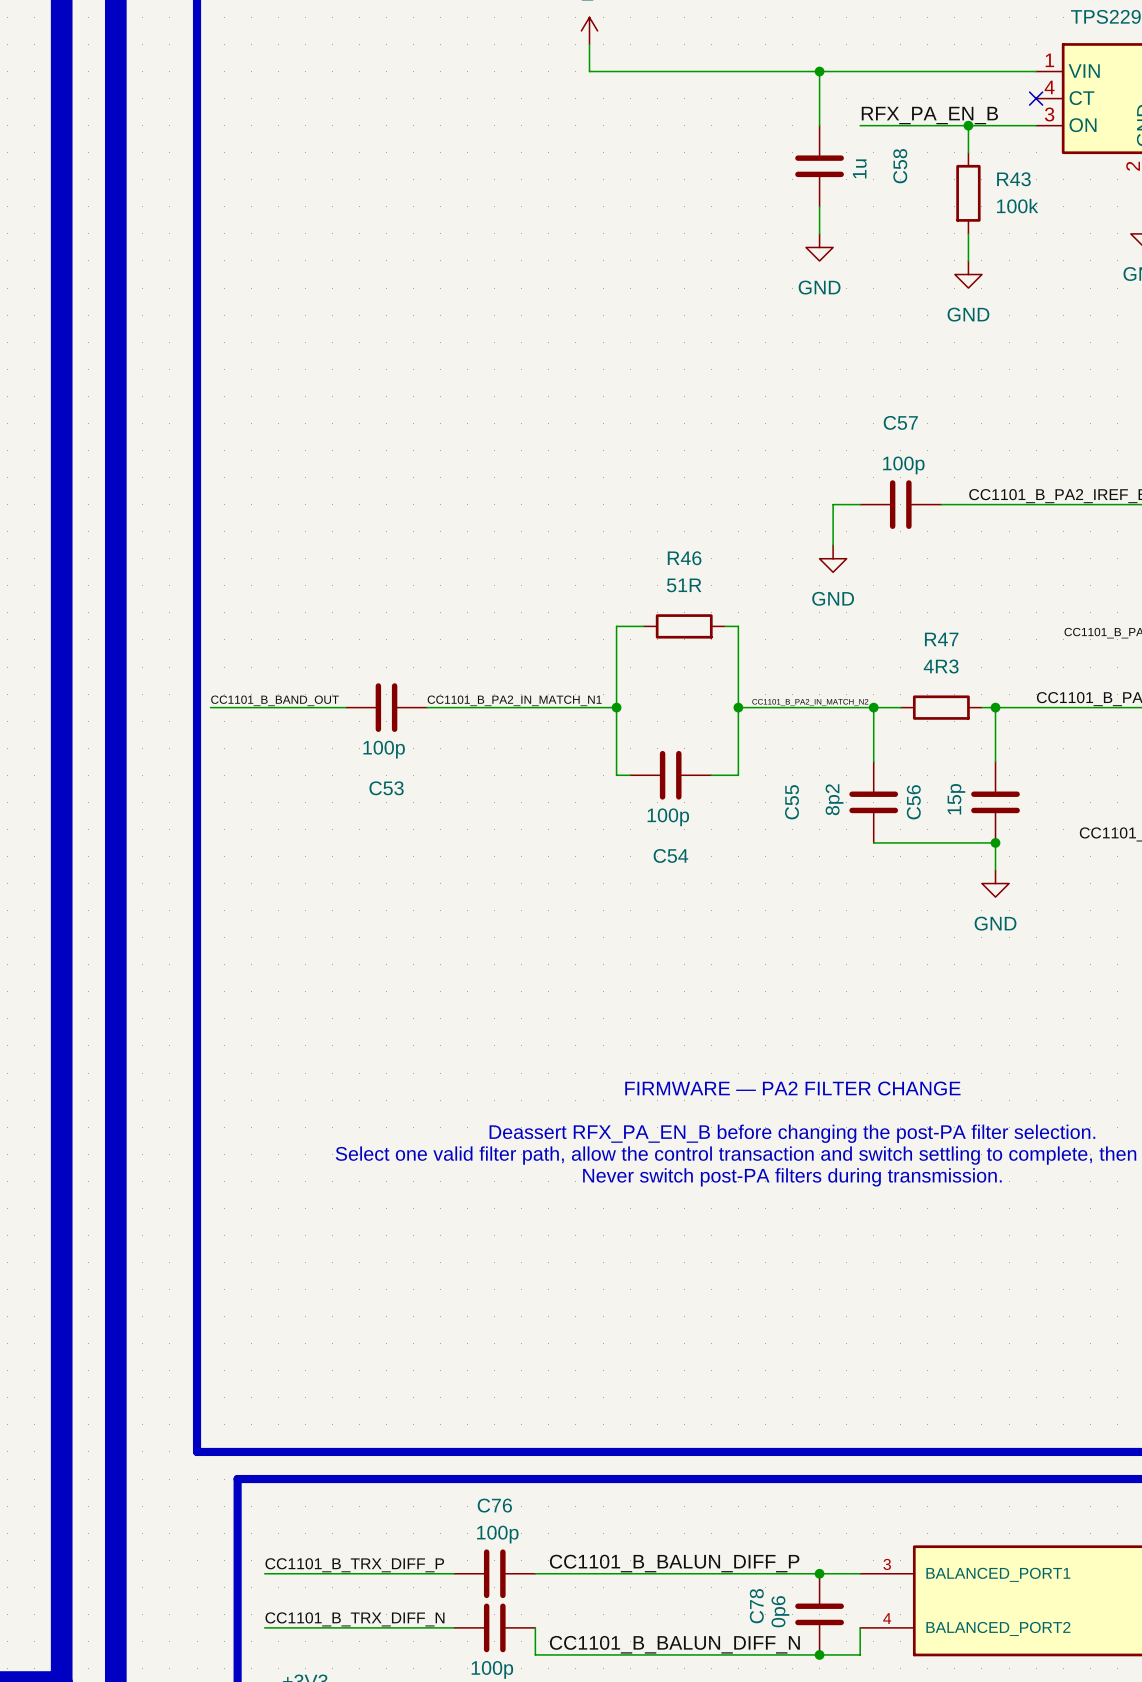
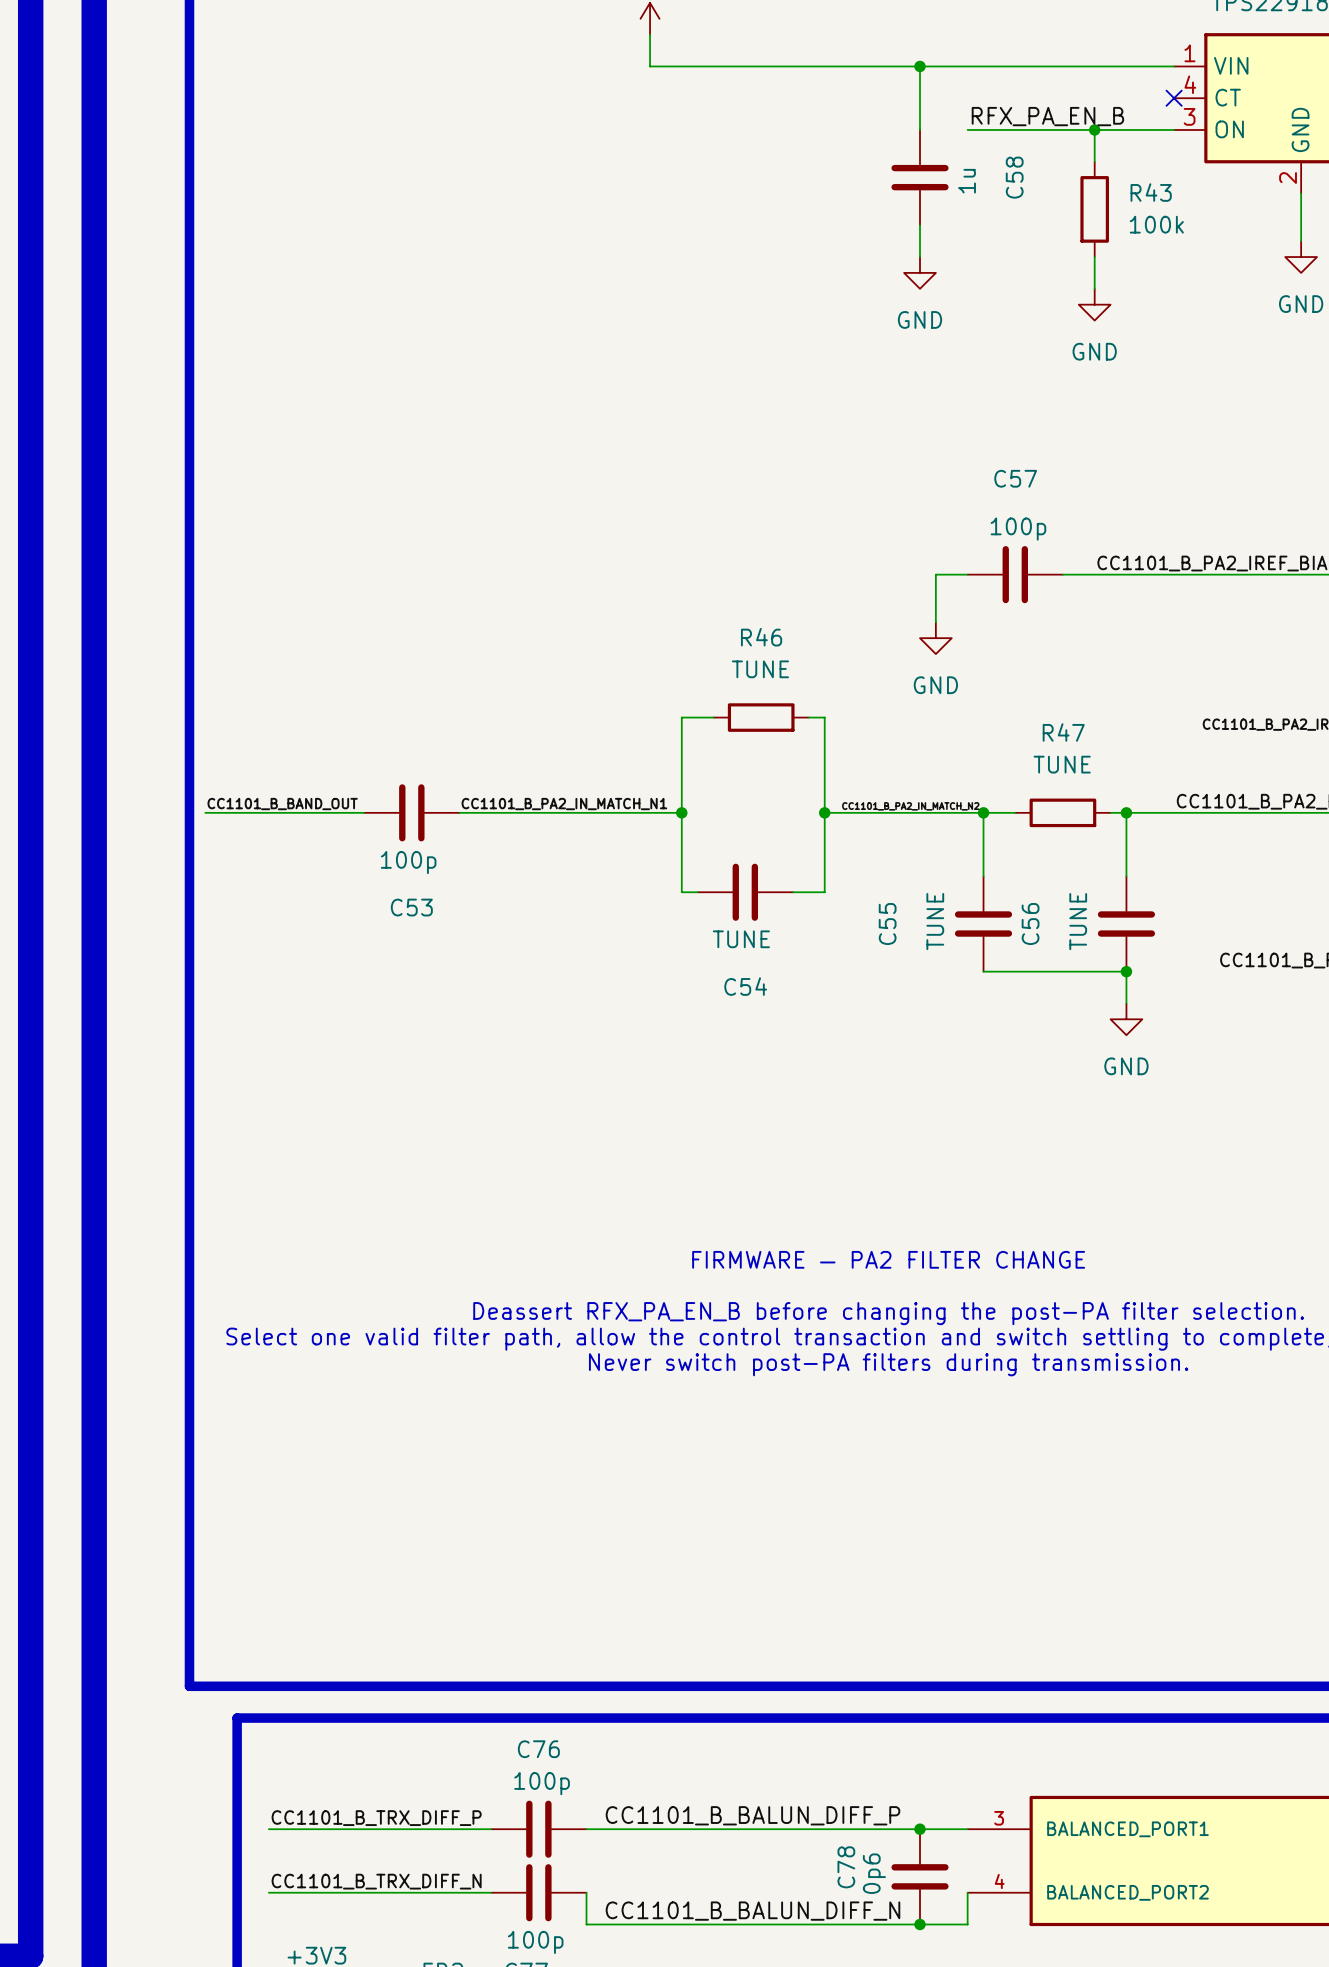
R46 value: 51R (684, 585) -> TUNE (760, 669)
R47 value: 4R3 (941, 666) -> TUNE (1062, 764)
C55 value: 8p2 (834, 799) -> TUNE (935, 921)
C56 value: 15p (956, 799) -> TUNE (1078, 921)
C54 value: 100p (668, 817) -> TUNE (741, 939)

